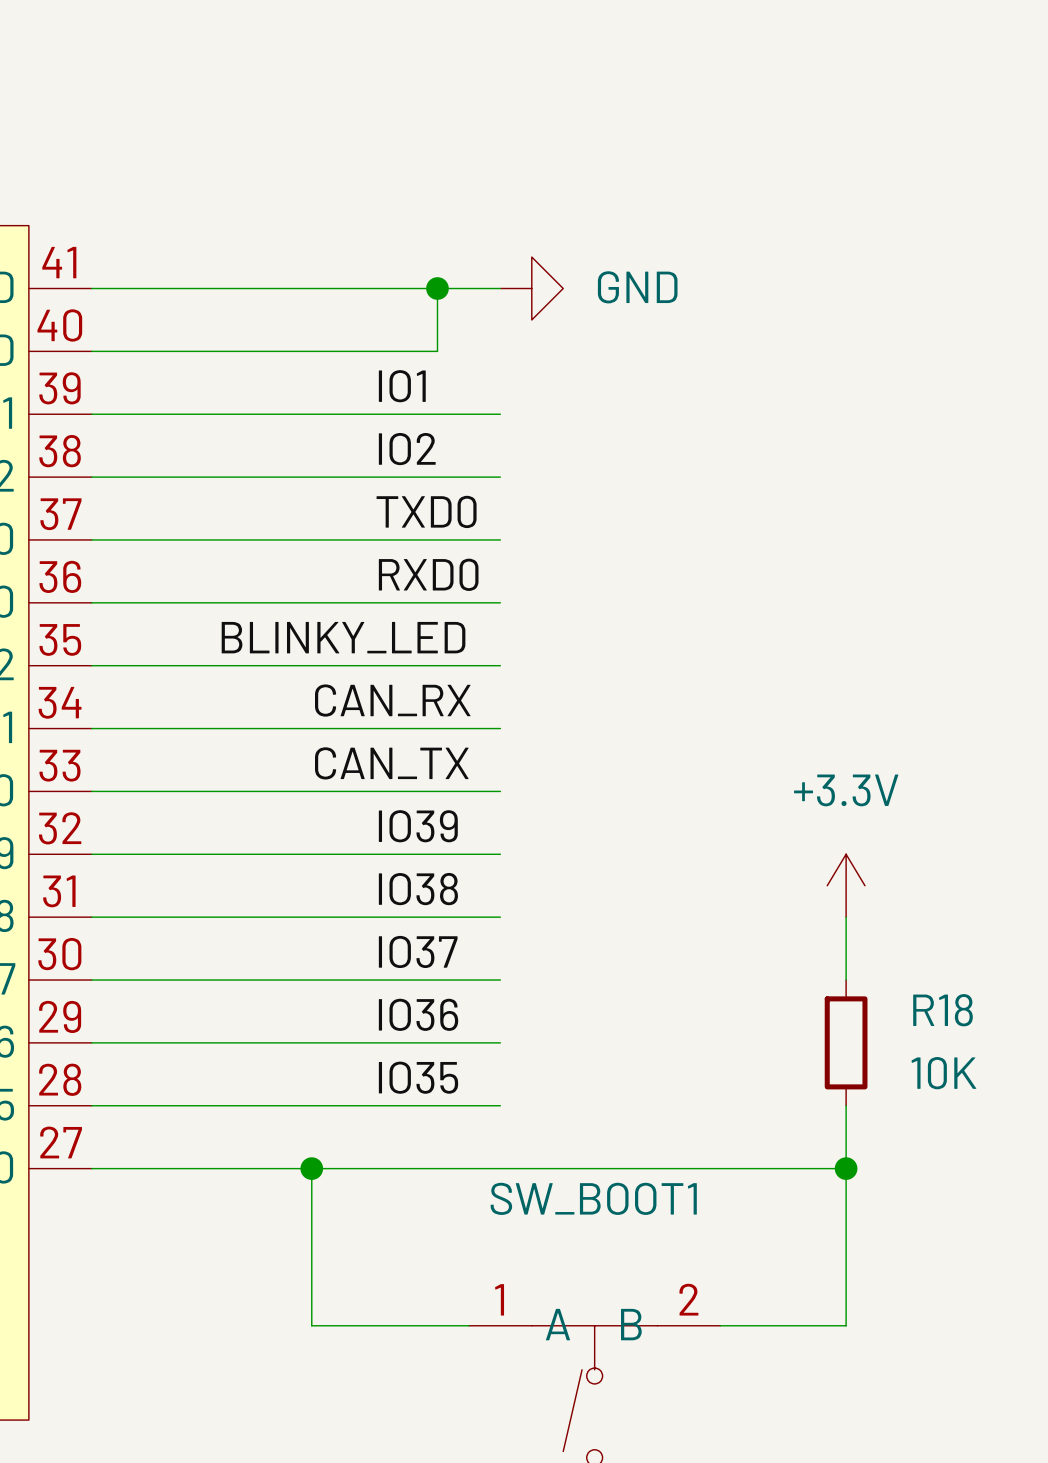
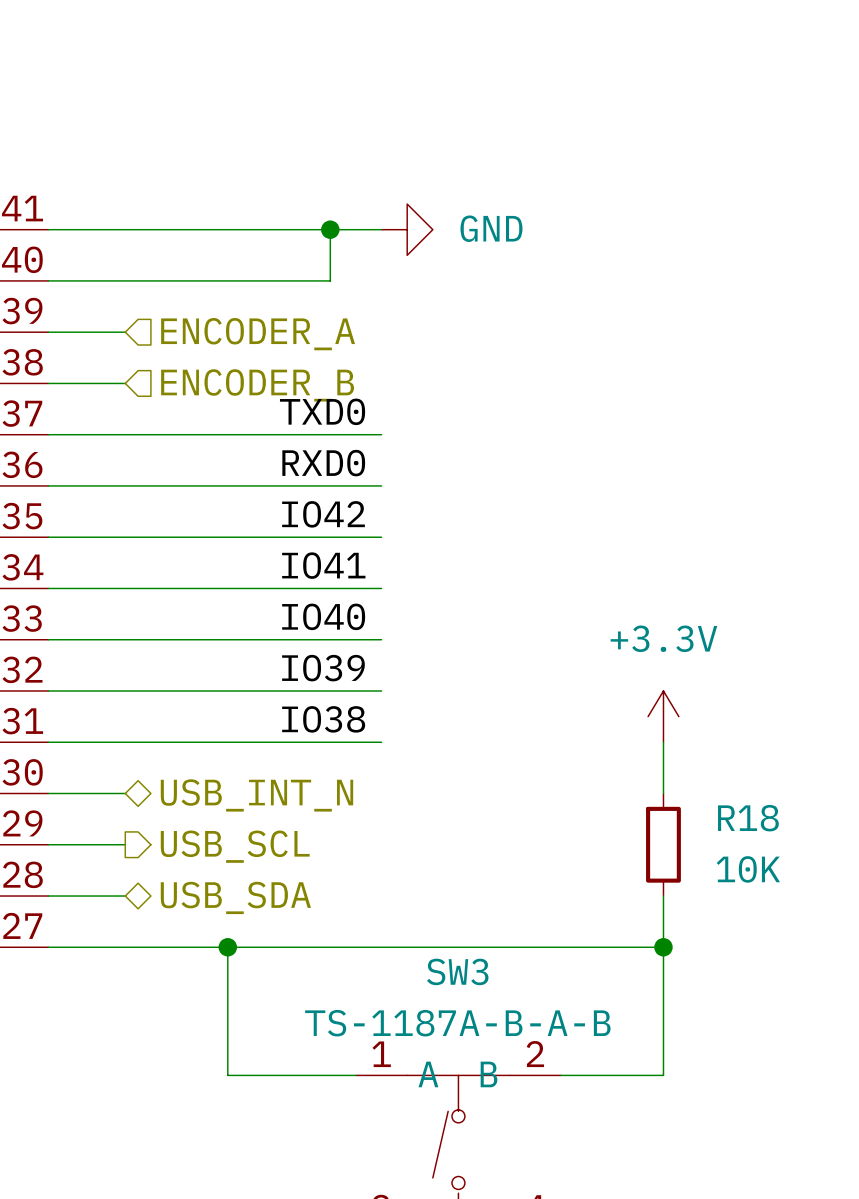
label: IO1 (402, 386) -> none
hierarchical label: none -> ENCODER_A (258, 334)
wire: (186, 414) (500, 414) -> none
label: IO2 (407, 449) -> none
hierarchical label: none -> ENCODER_B (257, 385)
wire: (186, 477) (500, 477) -> none
label: BLINKY_LED (343, 637) -> none
label: none -> IO42 (323, 514)
label: CAN_RX (392, 700) -> none
label: none -> IO41 (323, 565)
label: CAN_TX (391, 763) -> none
label: none -> IO40 (323, 616)
label: IO37 (418, 951) -> none
hierarchical label: none -> USB_INT_N (256, 795)
wire: (186, 980) (500, 980) -> none
label: IO36 (418, 1014) -> none
hierarchical label: none -> USB_SCL (235, 846)
wire: (186, 1042) (500, 1042) -> none
label: IO35 (418, 1077) -> none
hierarchical label: none -> USB_SDA (235, 897)
wire: (186, 1105) (500, 1105) -> none
SW_BOOT1 name: SW_BOOT1 (593, 1198) -> SW3 (457, 971)
SW_BOOT1 value: none -> TS-1187A-B-A-B (457, 1023)

